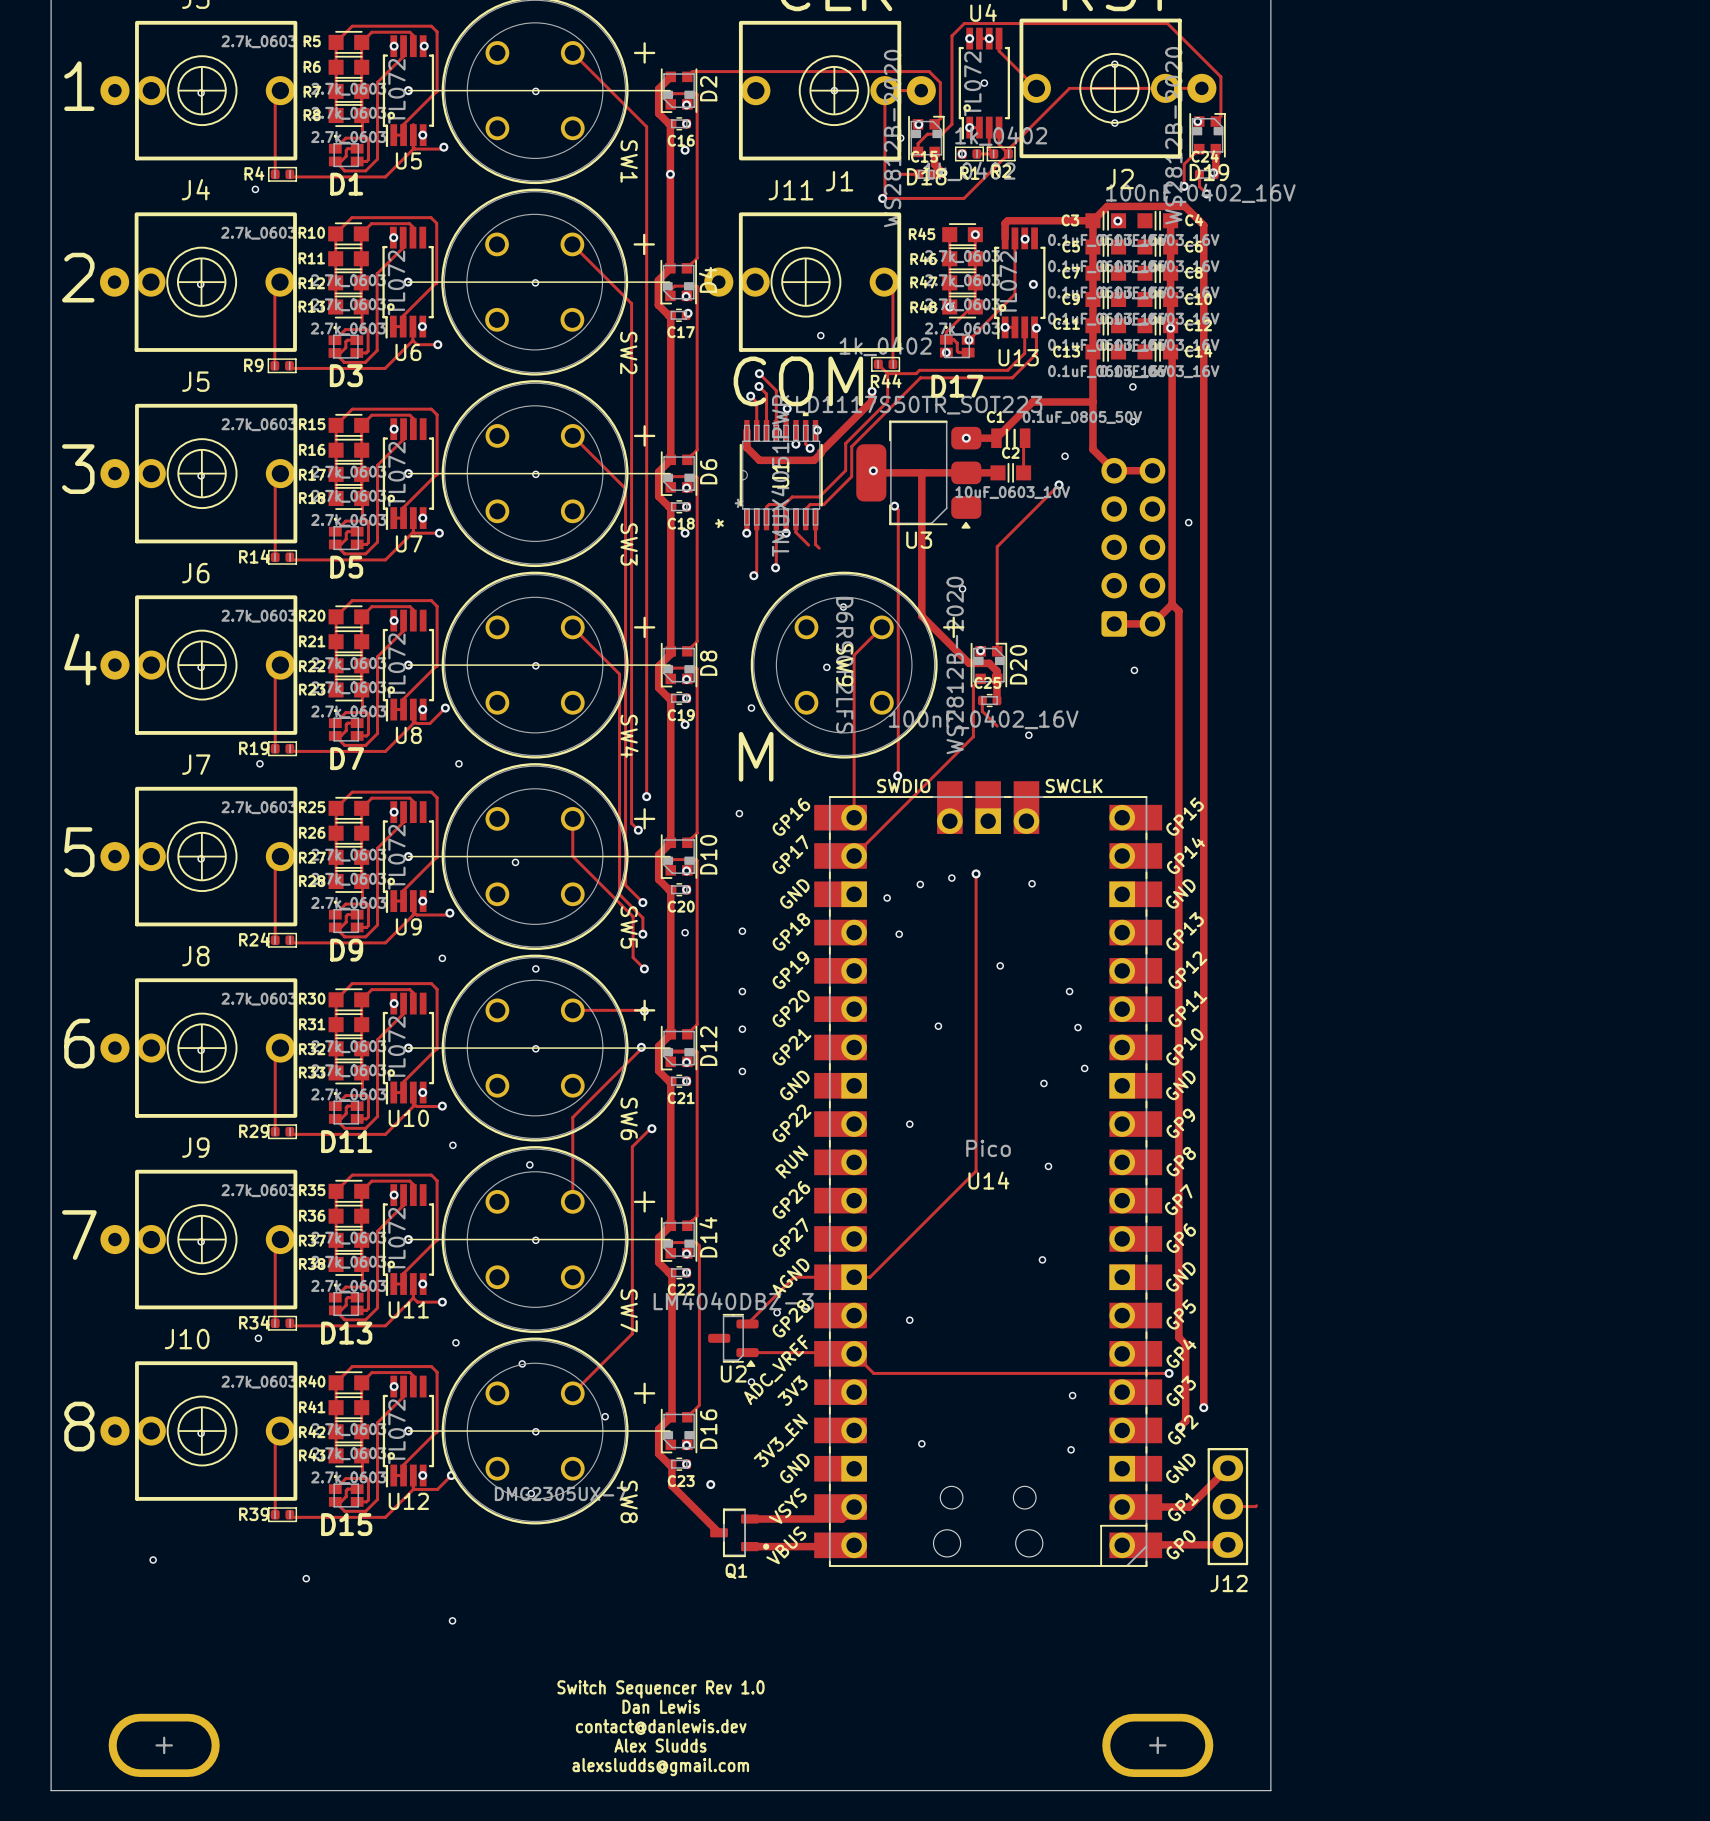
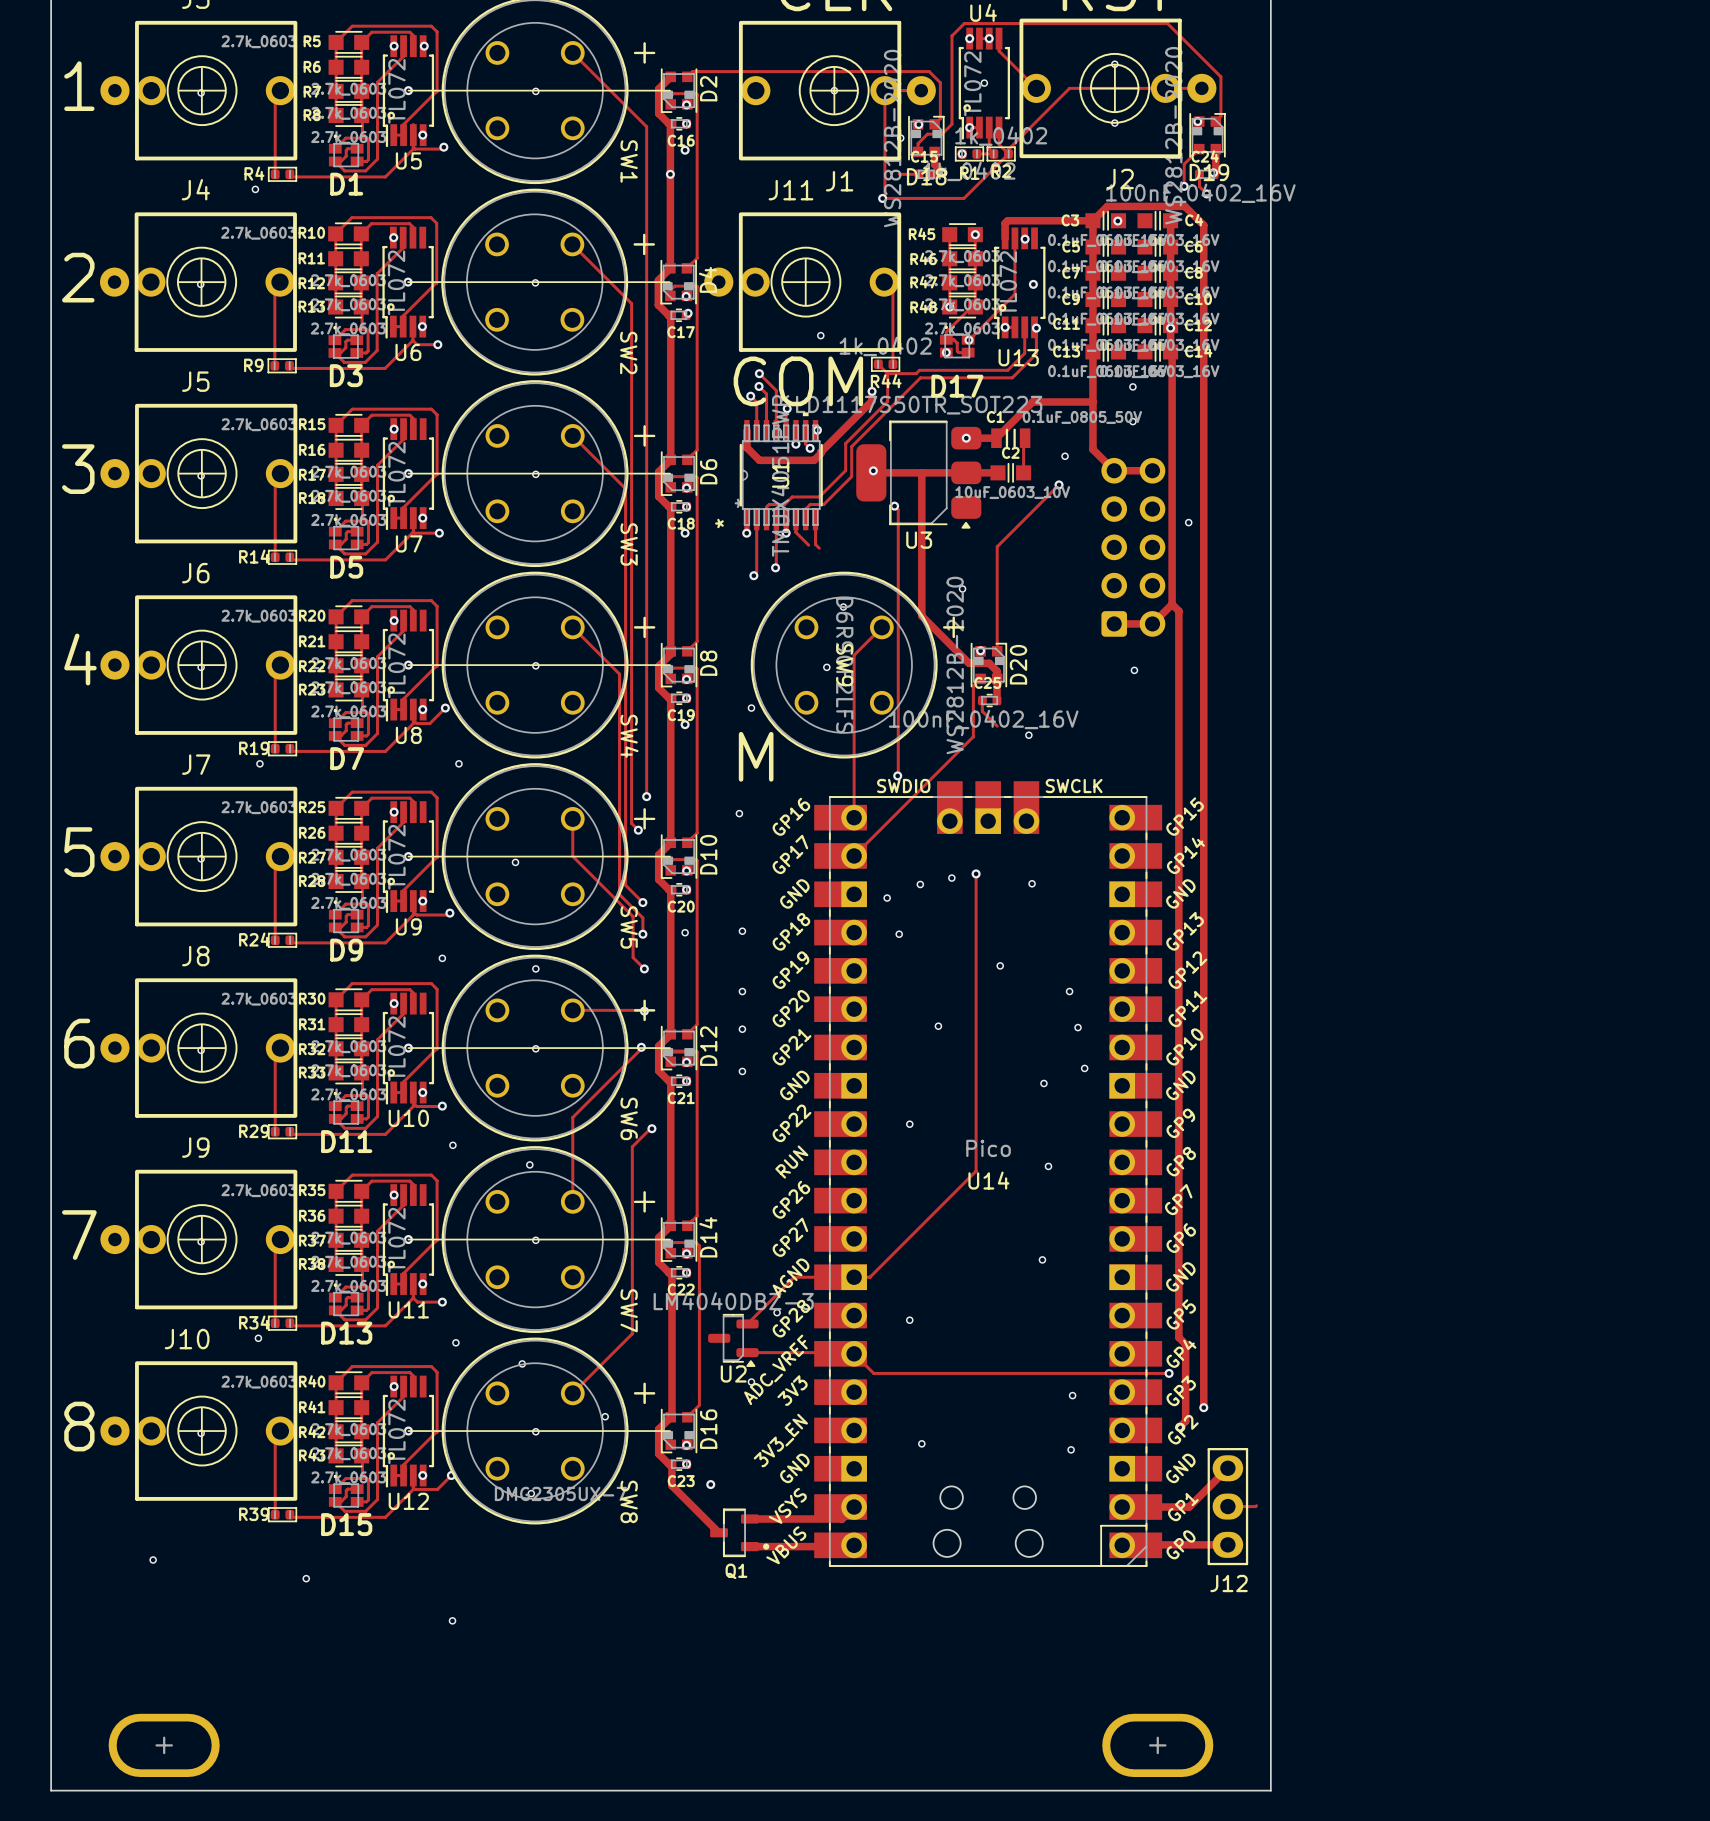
text: Switch Sequencer Rev 1.0 (660, 1689) -> none
text: Dan Lewis (661, 1706) -> none
text: contact@danlewis.dev (661, 1727) -> none
text: Alex Sludds (660, 1745) -> none
text: alexsludds@gmail.com (660, 1767) -> none

